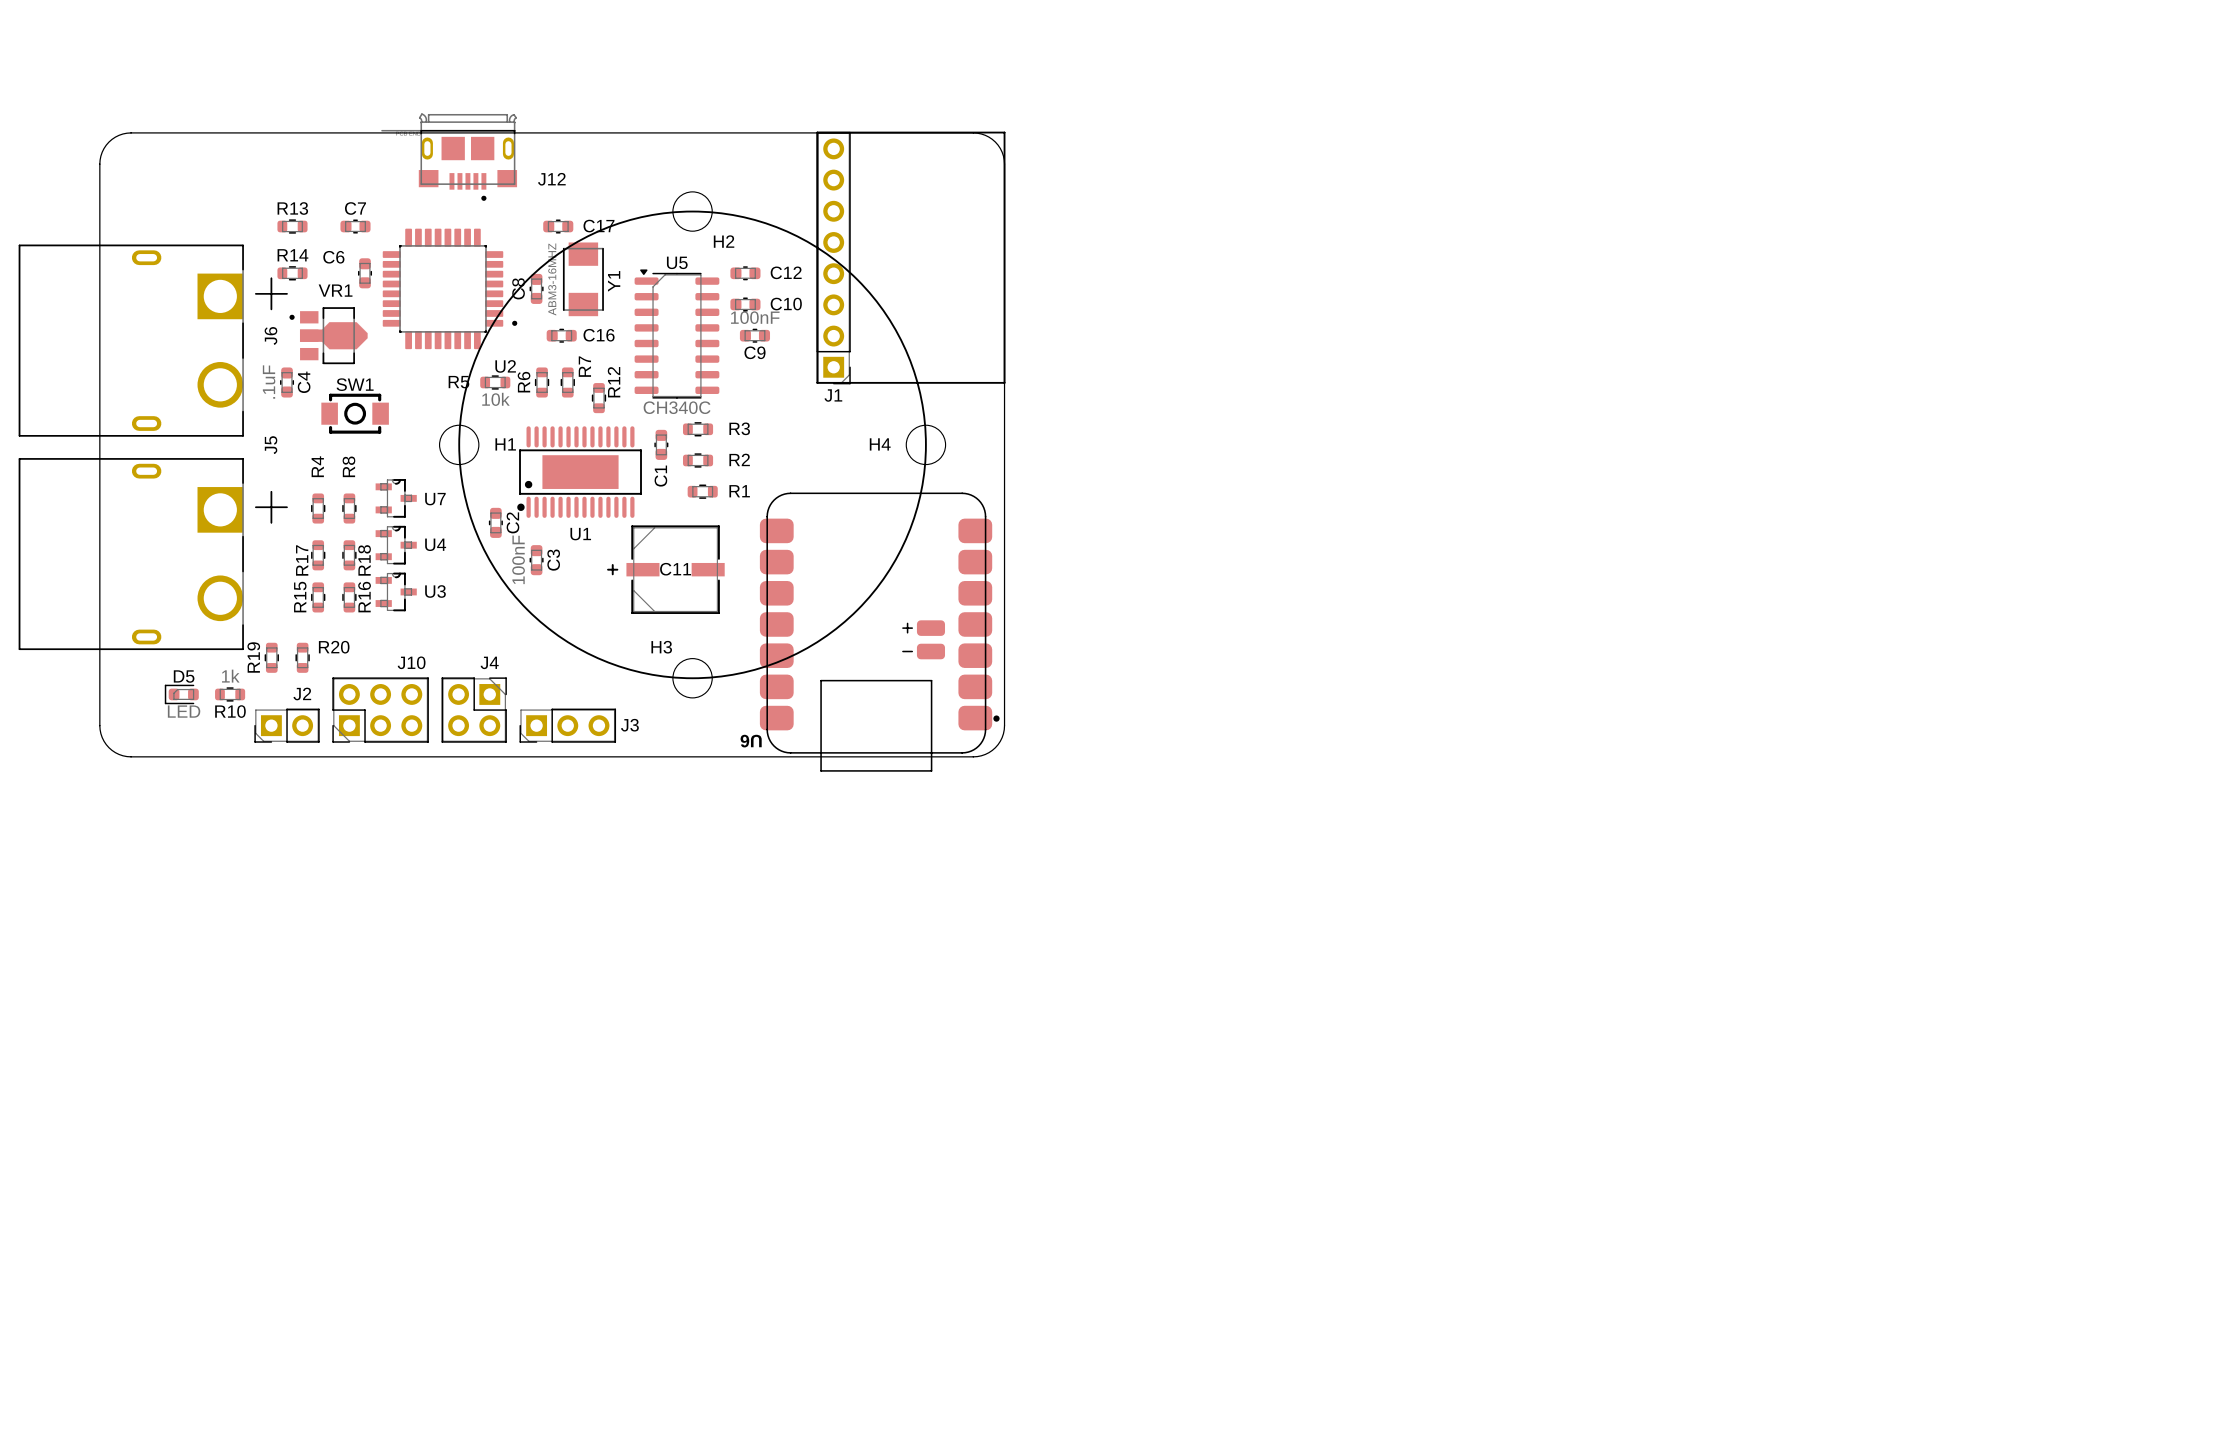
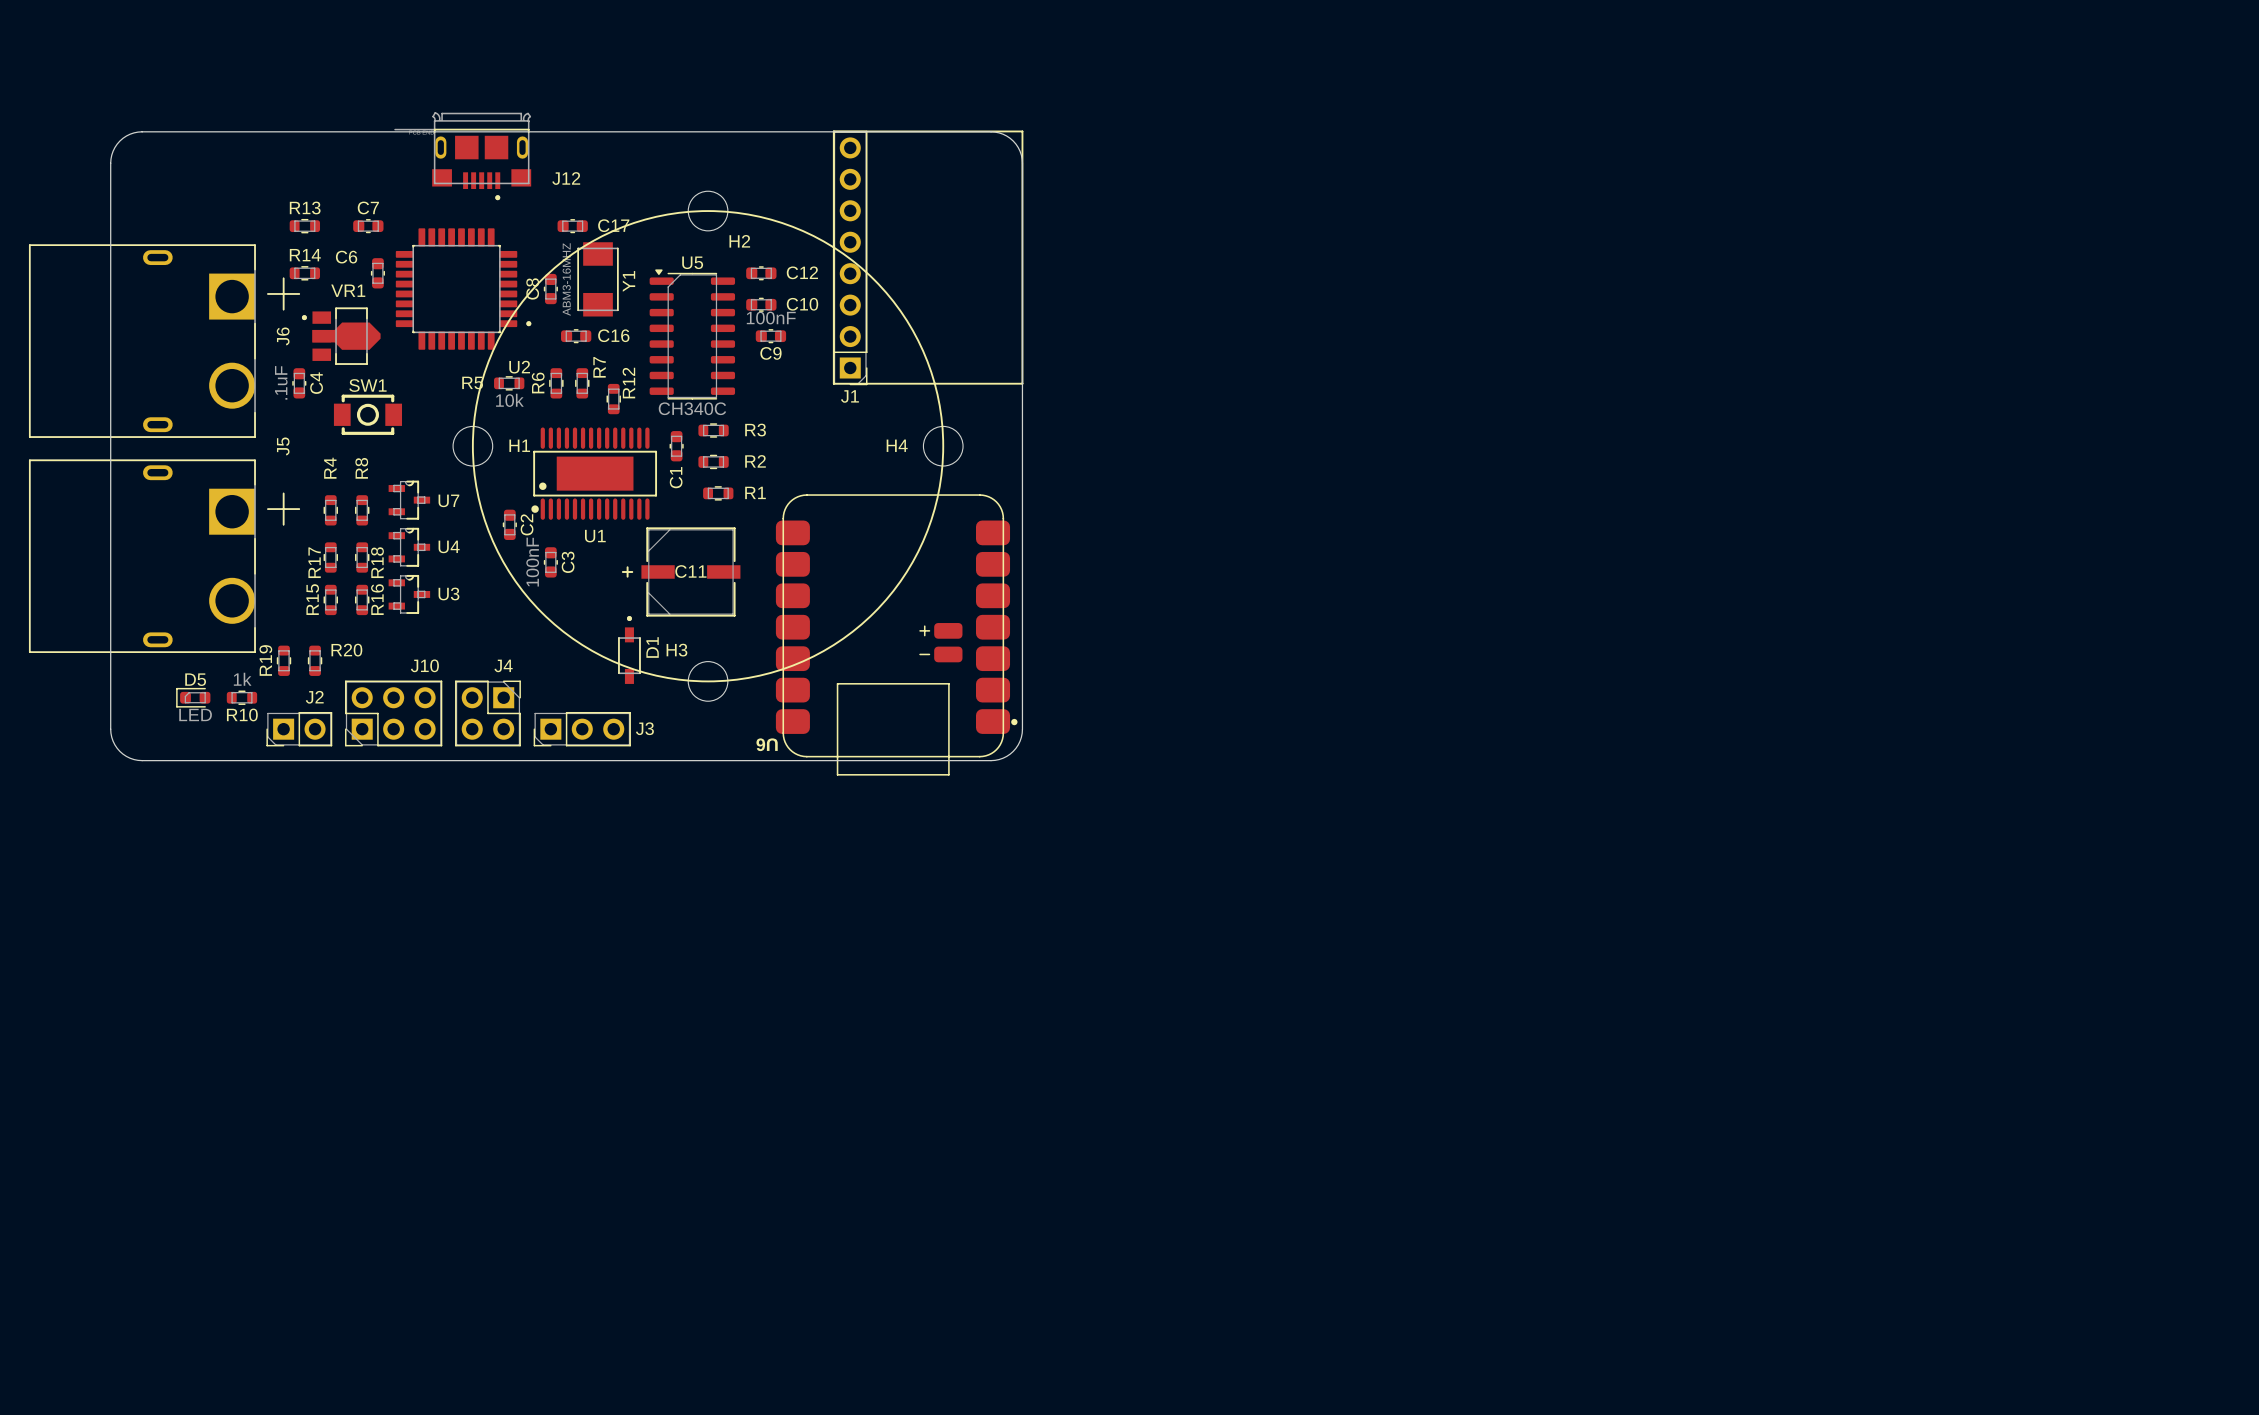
D1: none -> (629, 649)

